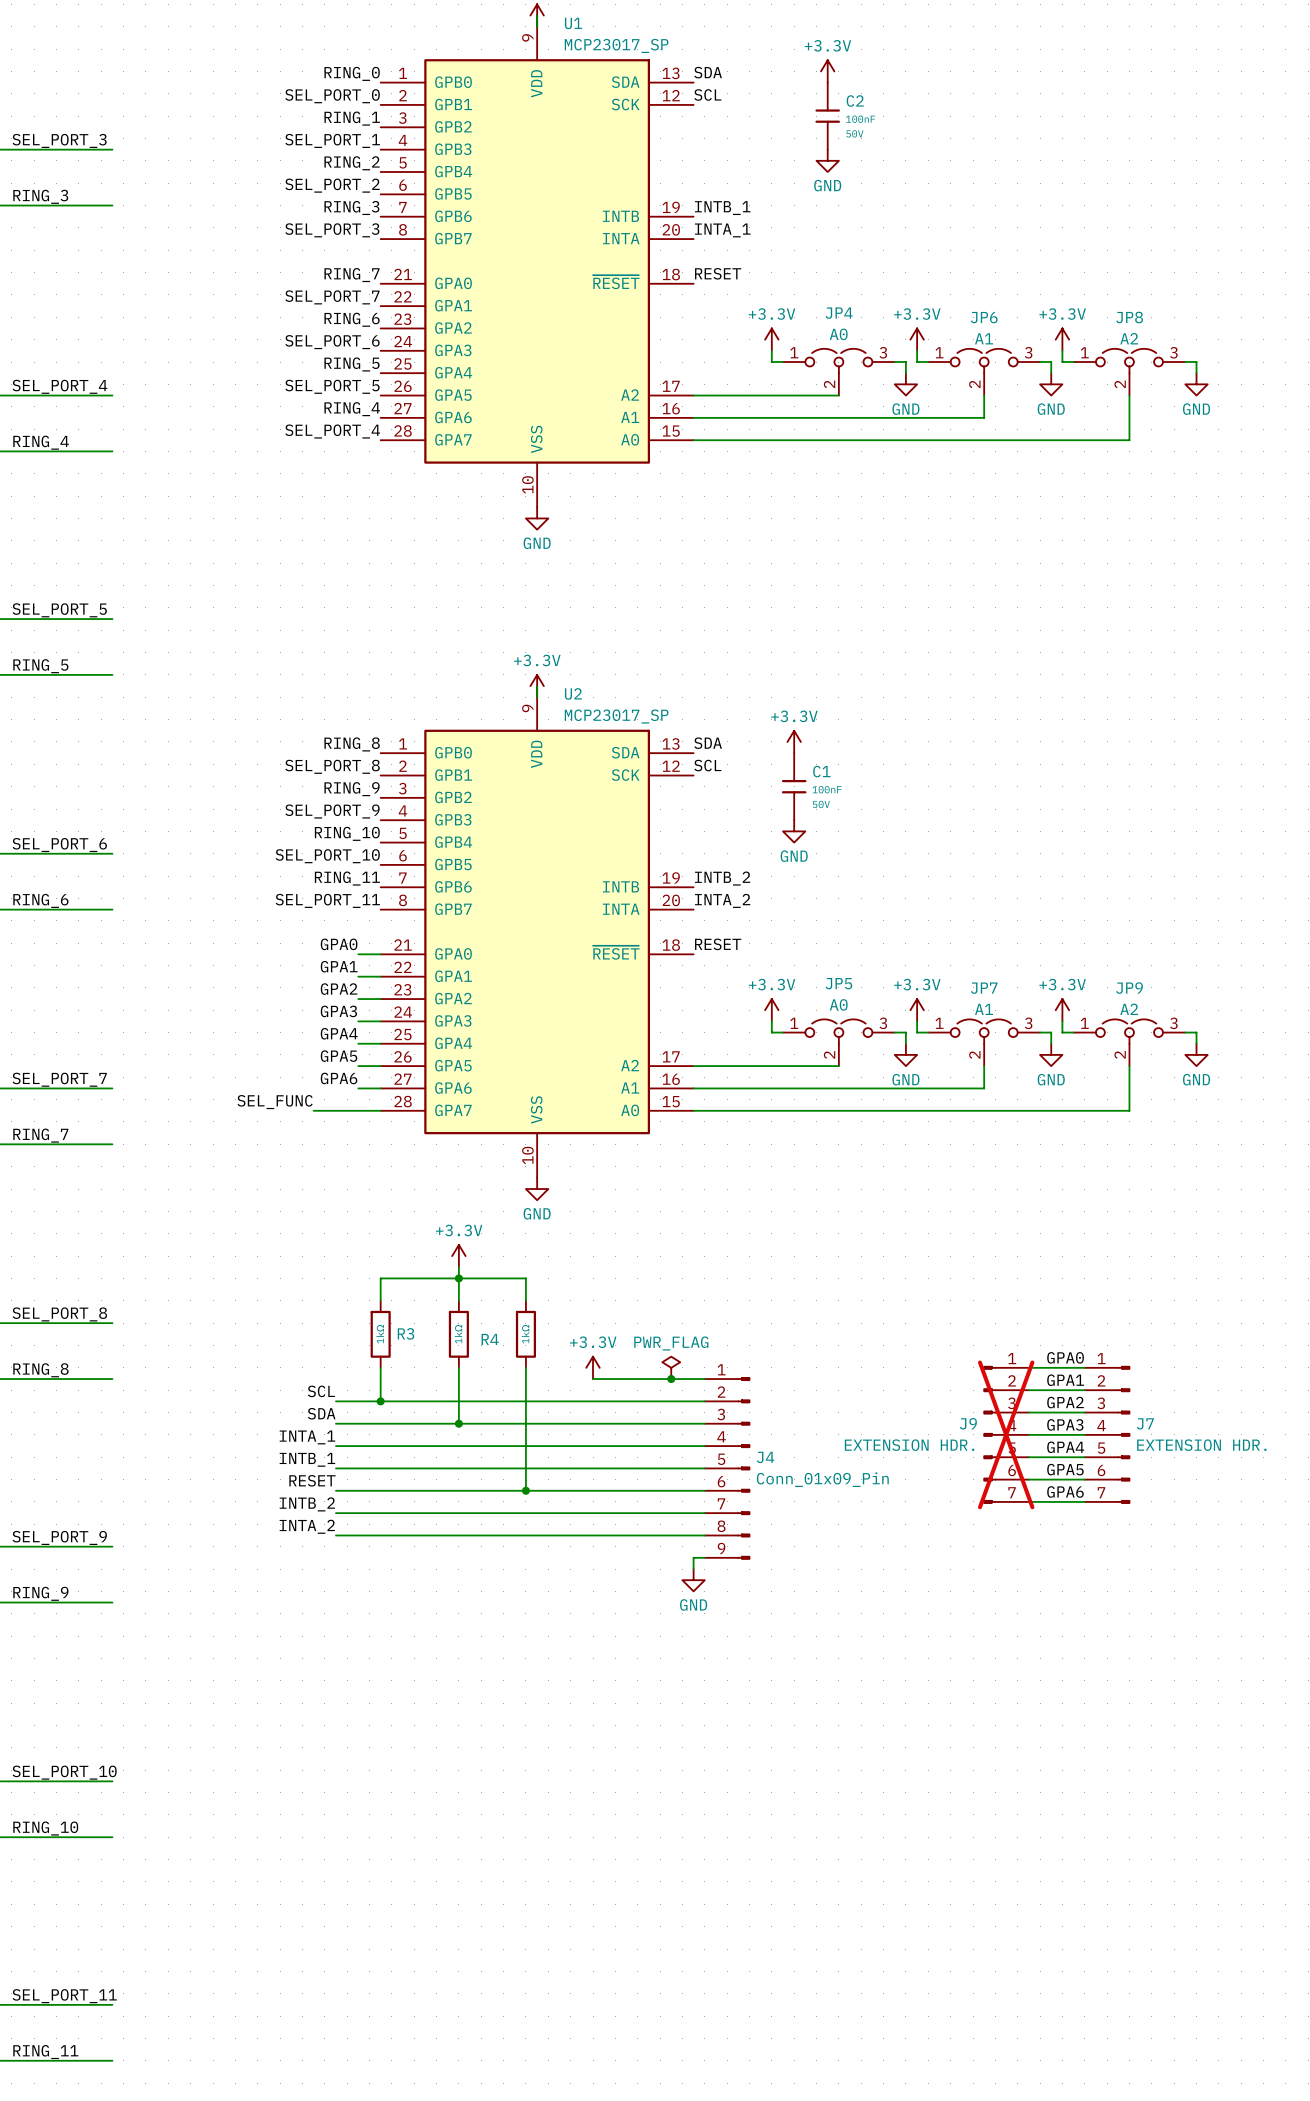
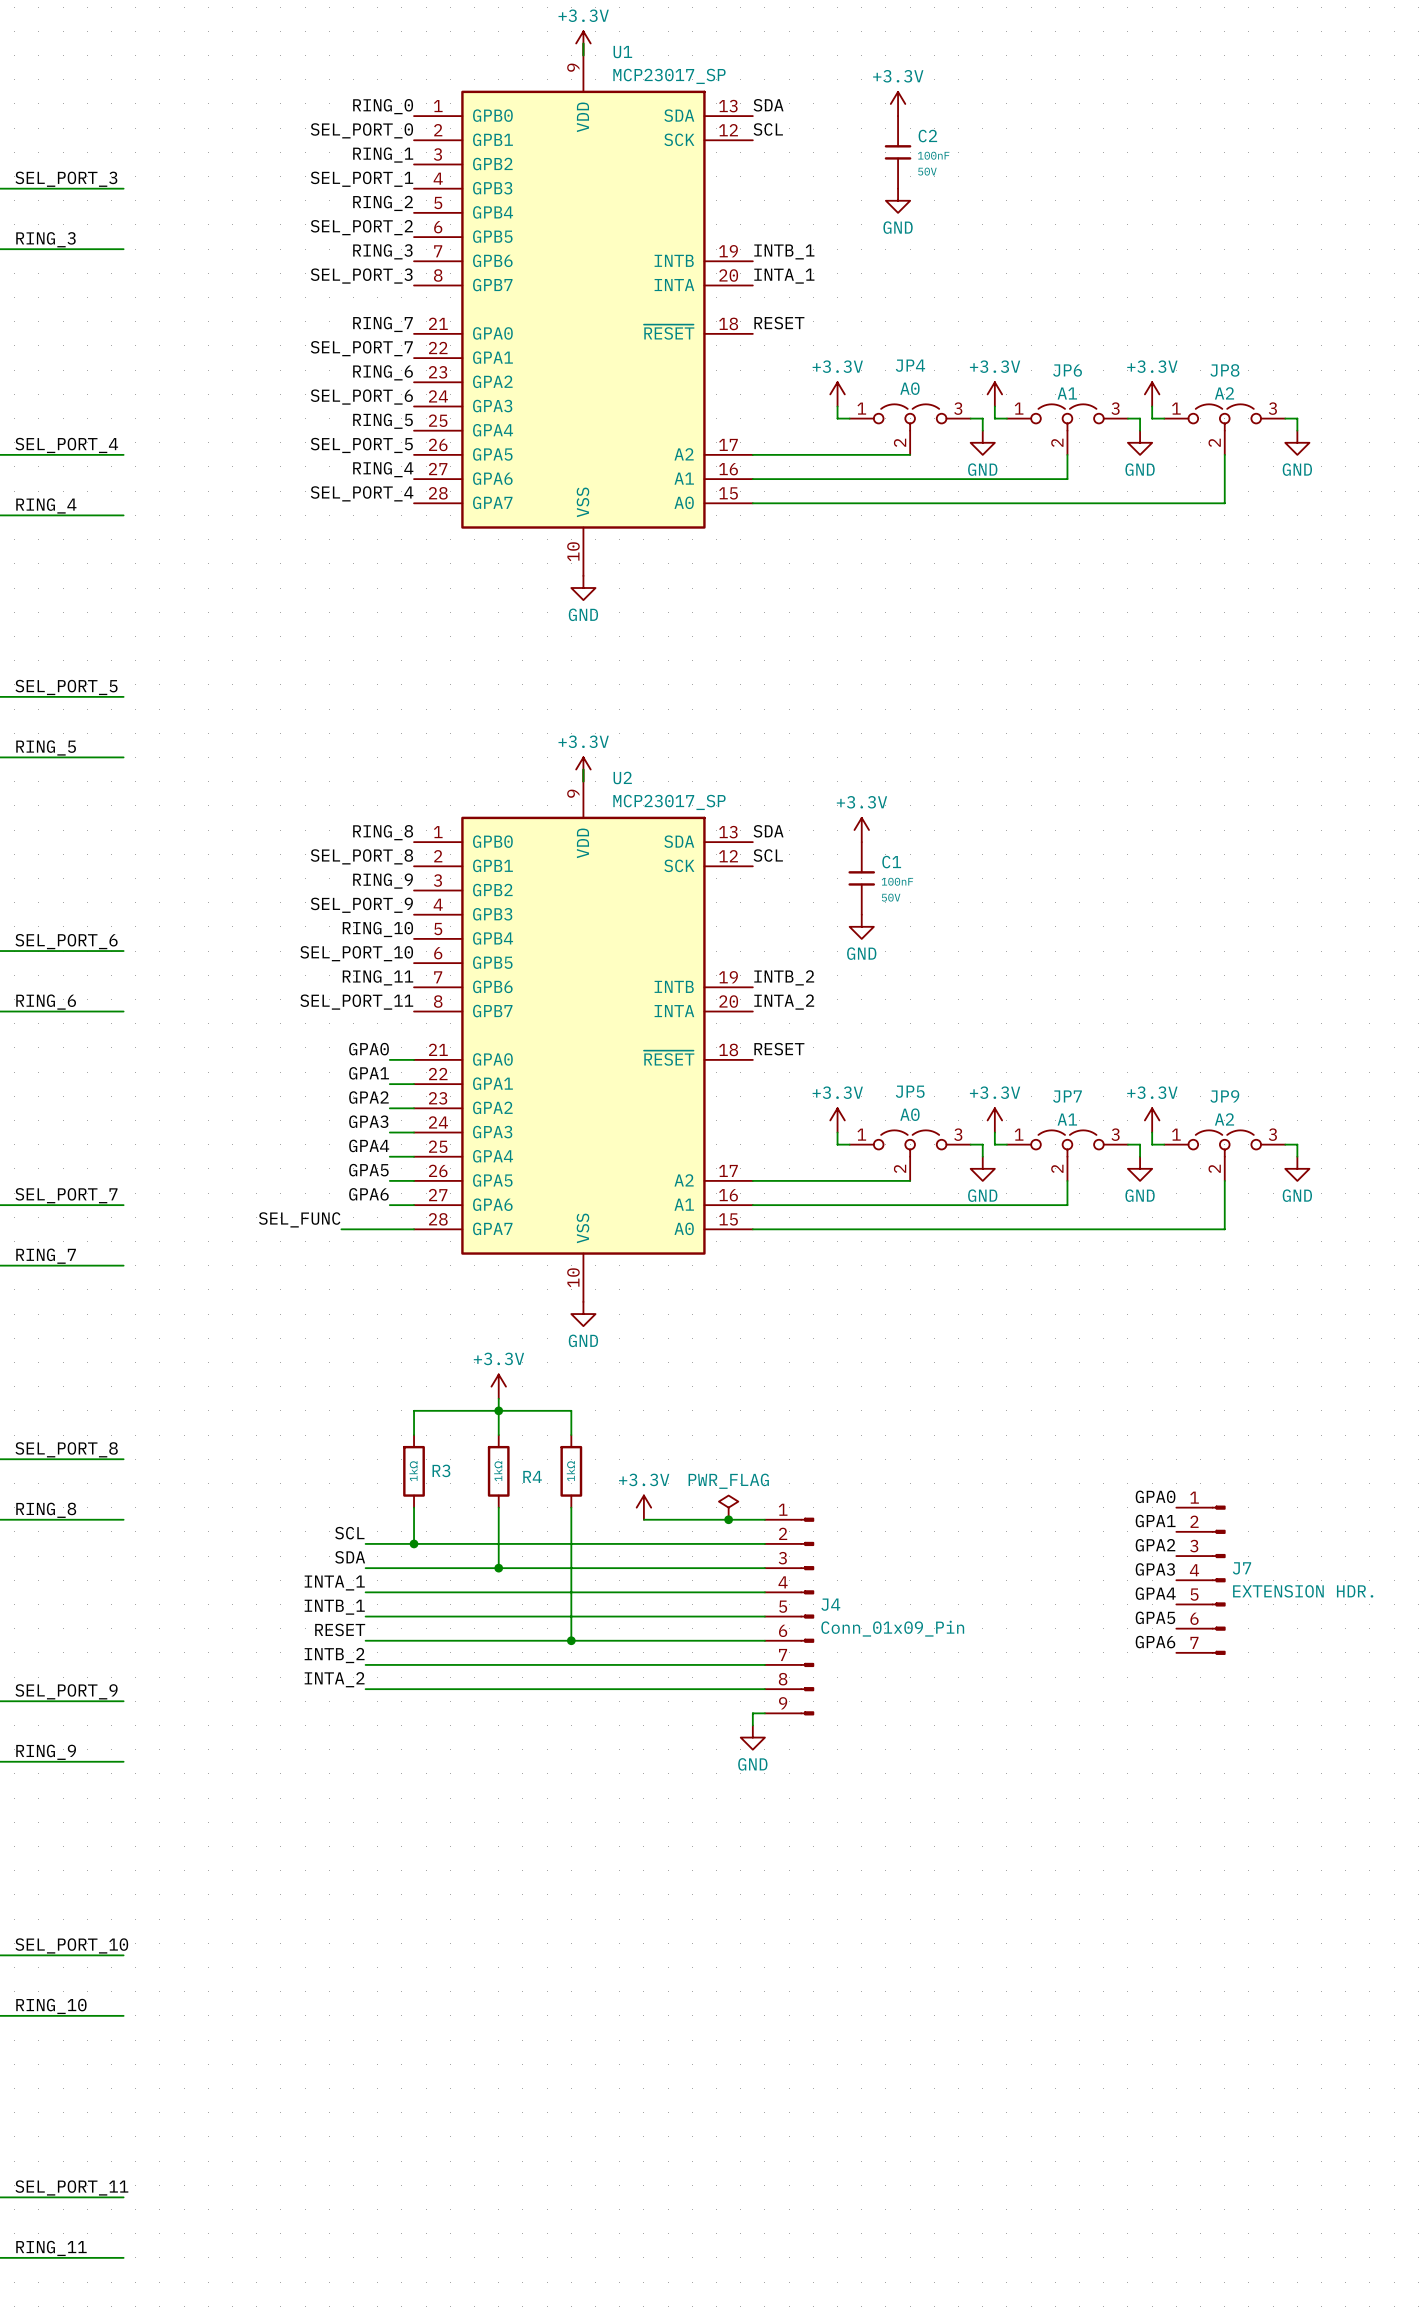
wire: (1028, 1367) (1084, 1367) -> none
wire: (1028, 1390) (1084, 1390) -> none
wire: (1028, 1412) (1084, 1412) -> none
J9: EXTENSION HDR. (1006, 1434) -> none
wire: (1028, 1434) (1084, 1434) -> none
wire: (1028, 1457) (1084, 1457) -> none
wire: (1028, 1479) (1084, 1479) -> none
wire: (1028, 1501) (1084, 1501) -> none

